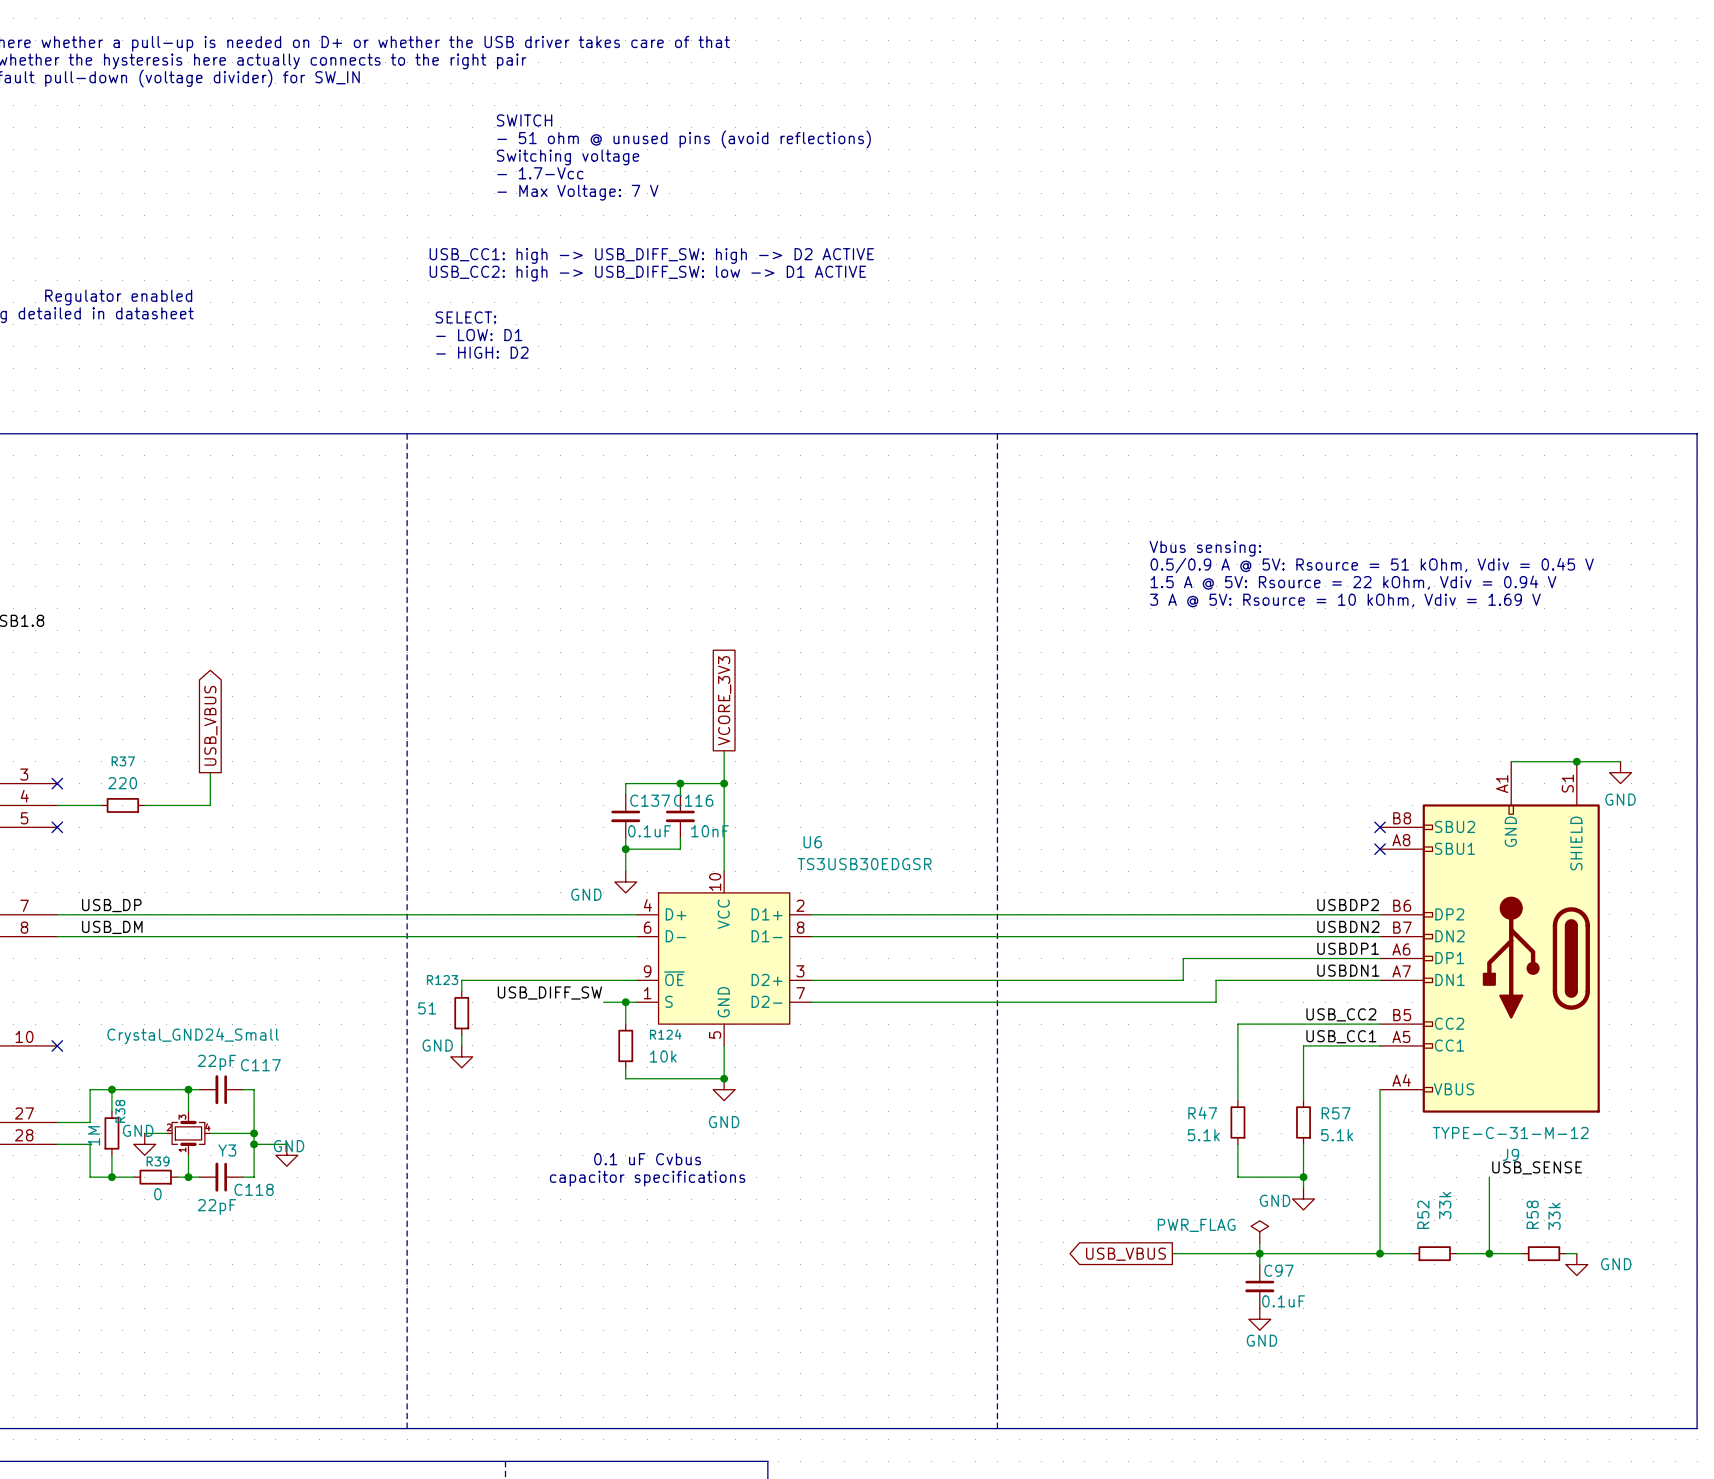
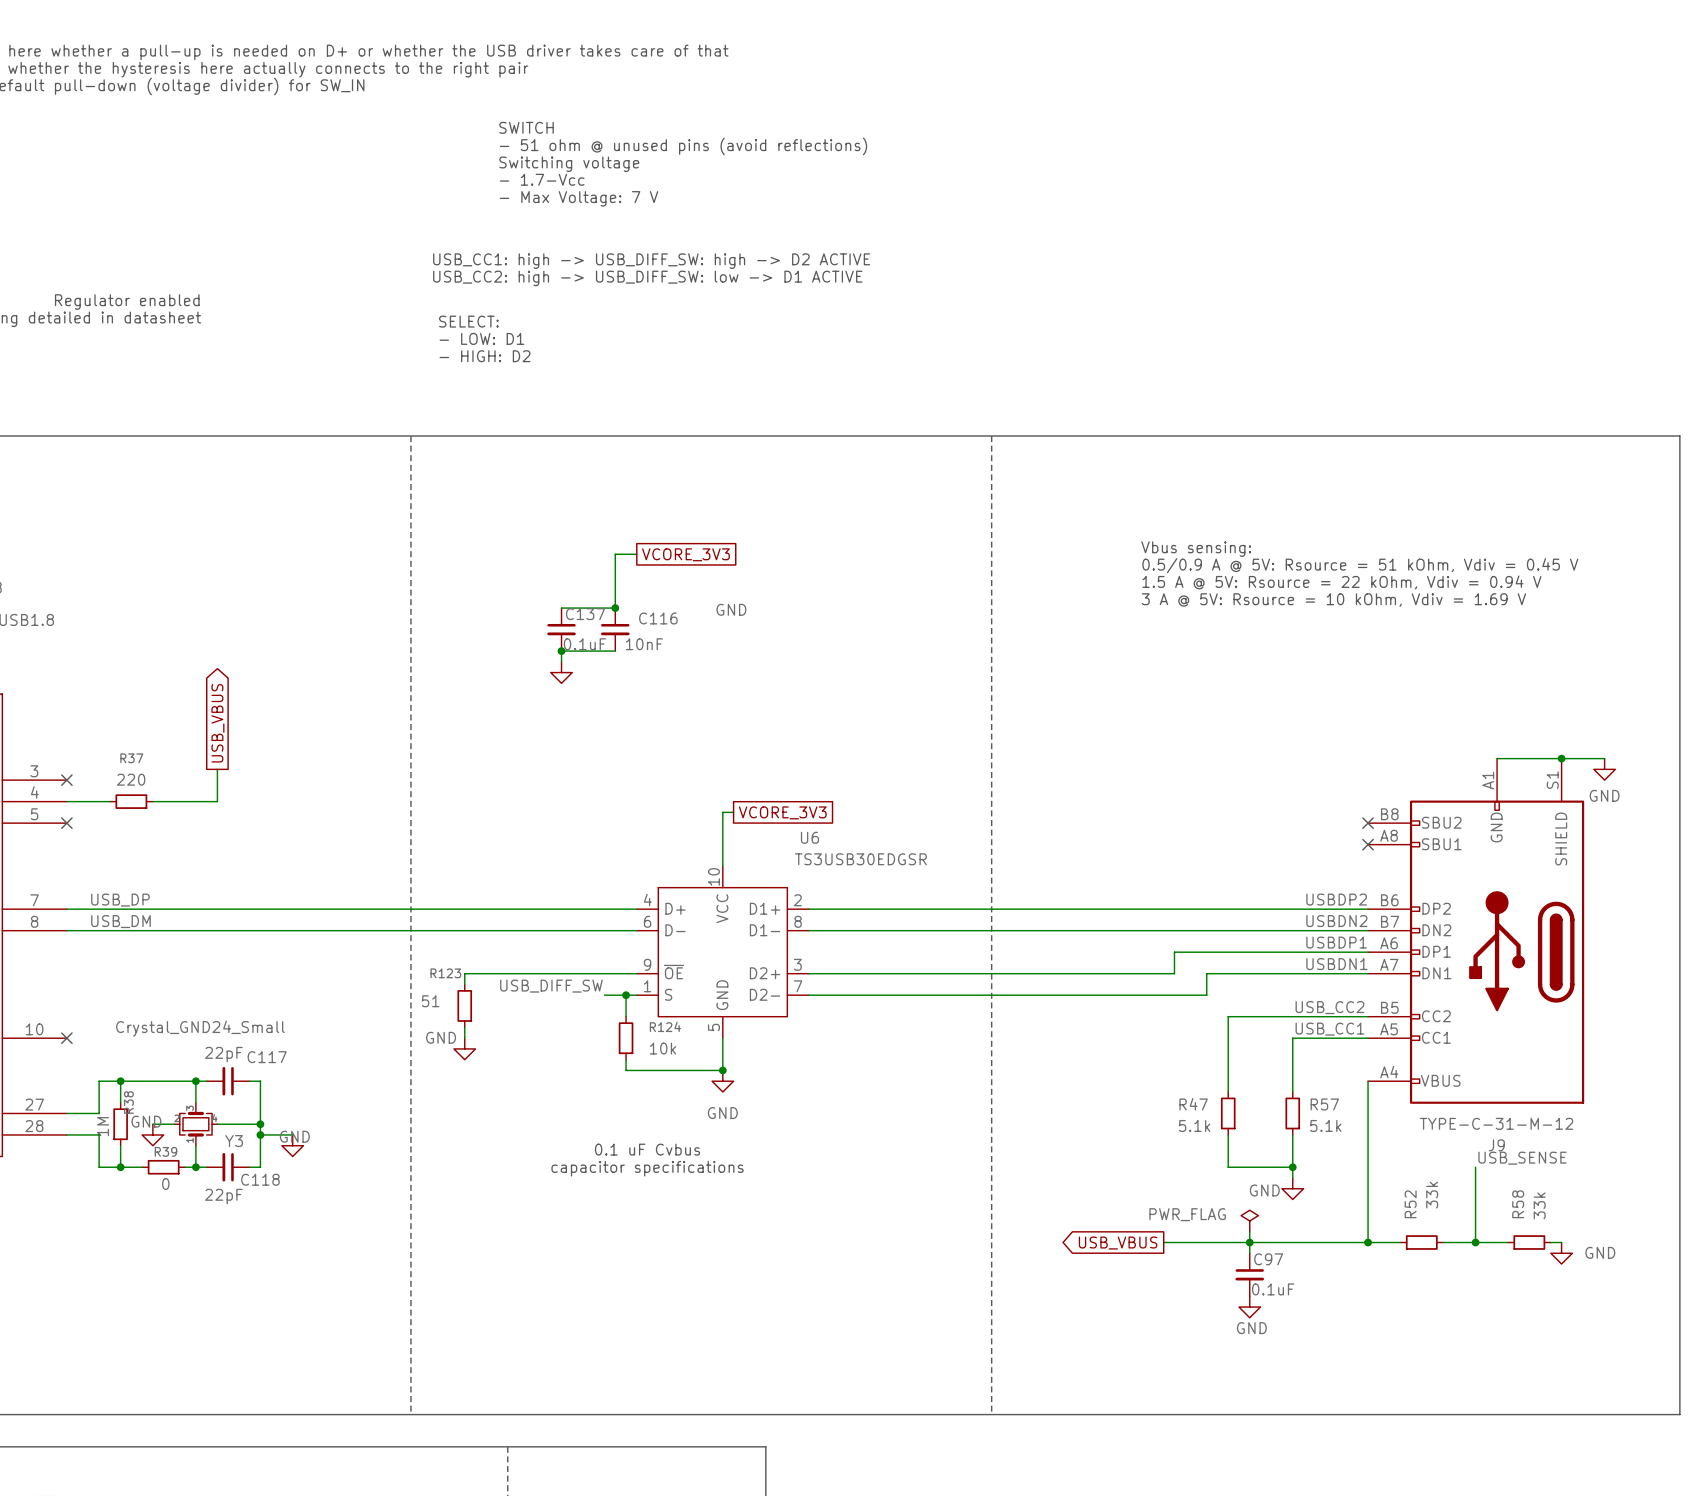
wire: none -> (636, 554) (615, 554) (615, 608) (561, 608)
global label: none -> VCORE_3V3 (685, 554)
junction: none -> (615, 608)
junction: none -> (561, 651)
wire: none -> (615, 651) (561, 651) (561, 661)
power symbol: none -> GND (561, 672)
global label rotation: 0° (724, 700) -> 90° clockwise (782, 812)
global label position: VCORE_3V3 (724, 700) -> VCORE_3V3 (782, 812)
wire: (724, 750) (724, 816) -> (733, 812) (722, 812)
wire: (680, 783) (680, 794) -> none
junction: (680, 783) -> none
wire: (724, 783) (625, 783) (625, 794) -> none
junction: (724, 783) -> none
C116 name position: C116 (693, 800) -> C116 (658, 618)
C137 position: (625, 816) -> (561, 629)
C116 position: (680, 816) -> (615, 629)
wire: (625, 838) (625, 871) -> none
wire: (680, 838) (680, 849) (625, 849) -> none
junction: (625, 849) -> none
power symbol: GND (625, 881) -> none

